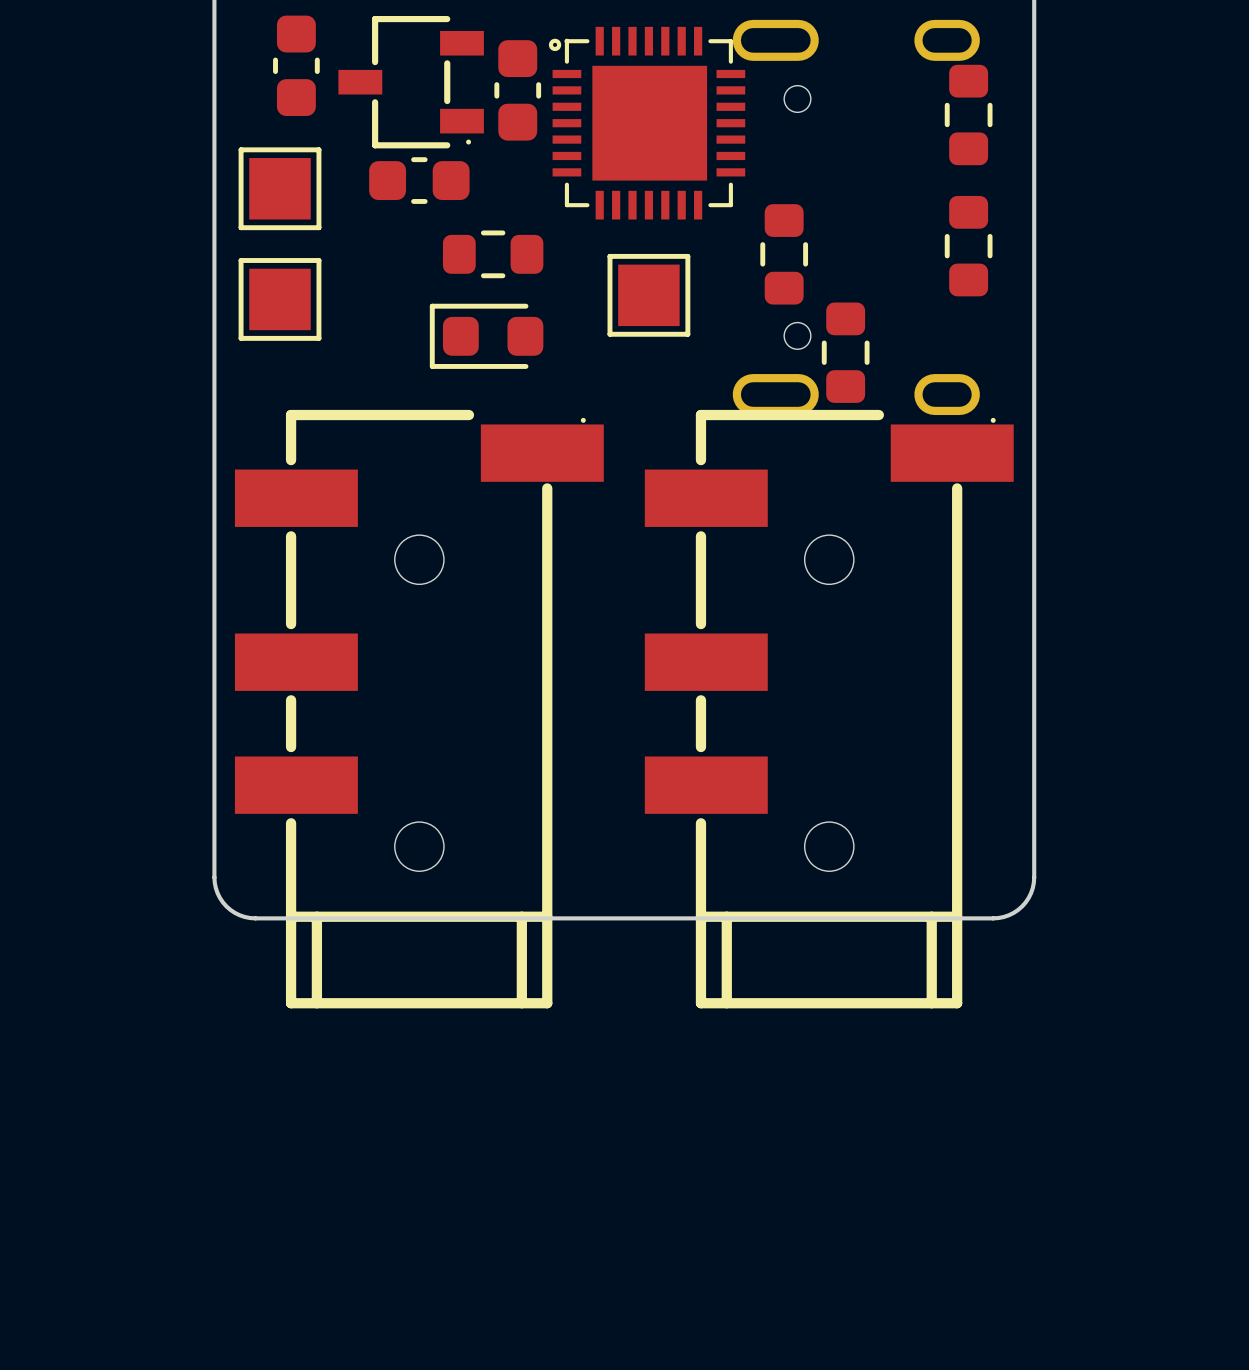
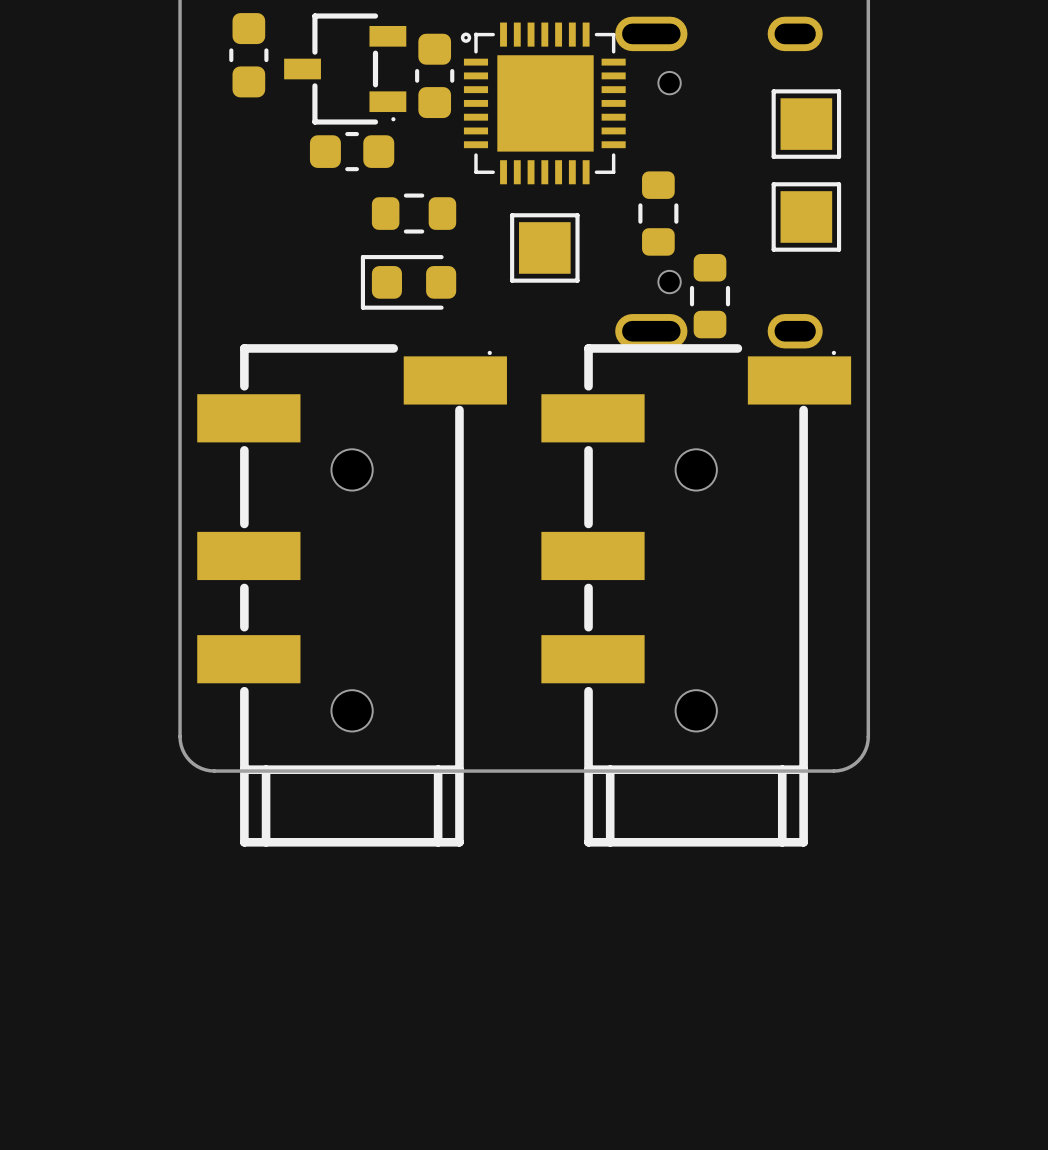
part footprint: [944, 64, 993, 166] -> [771, 89, 842, 159]
part: (280, 188) -> none
part footprint: [944, 195, 993, 297] -> [771, 182, 842, 252]
part: (280, 299) -> none

